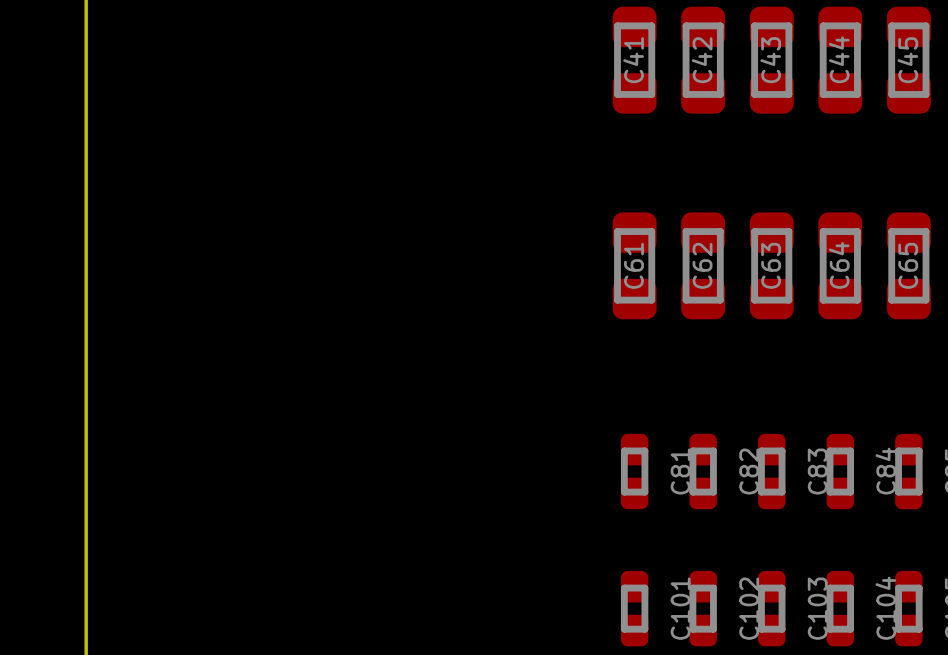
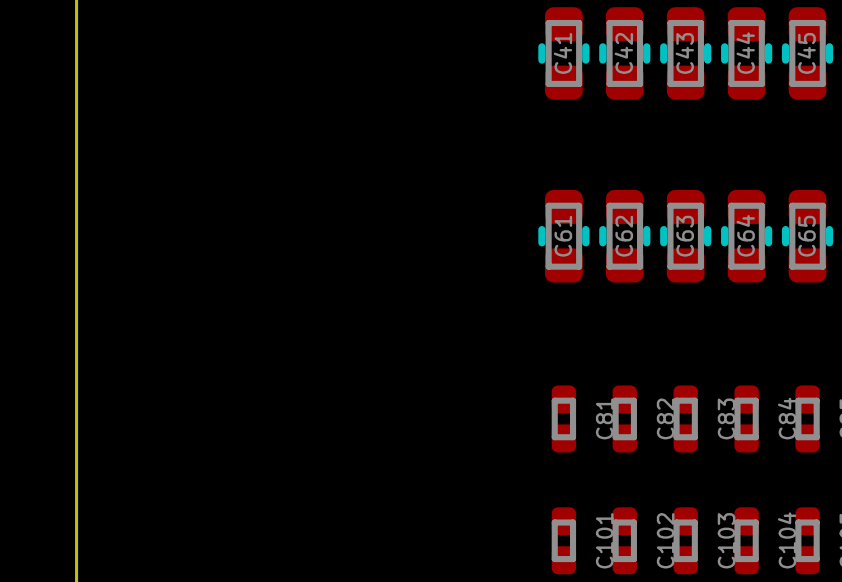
C41 footprint: [612, 6, 657, 114] -> [538, 7, 590, 100]
C42 footprint: [681, 6, 726, 114] -> [599, 7, 651, 100]
C43 footprint: [749, 6, 794, 114] -> [660, 7, 712, 100]
C44 footprint: [818, 6, 863, 114] -> [721, 7, 773, 100]
C45 footprint: [886, 6, 931, 114] -> [781, 7, 834, 100]
C61 footprint: [612, 212, 657, 320] -> [538, 189, 590, 283]
C62 footprint: [681, 212, 726, 320] -> [599, 189, 651, 283]
C63 footprint: [749, 212, 794, 320] -> [660, 189, 712, 283]
C64 footprint: [818, 212, 863, 320] -> [721, 189, 773, 283]
C65 footprint: [886, 212, 931, 320] -> [781, 189, 834, 283]

